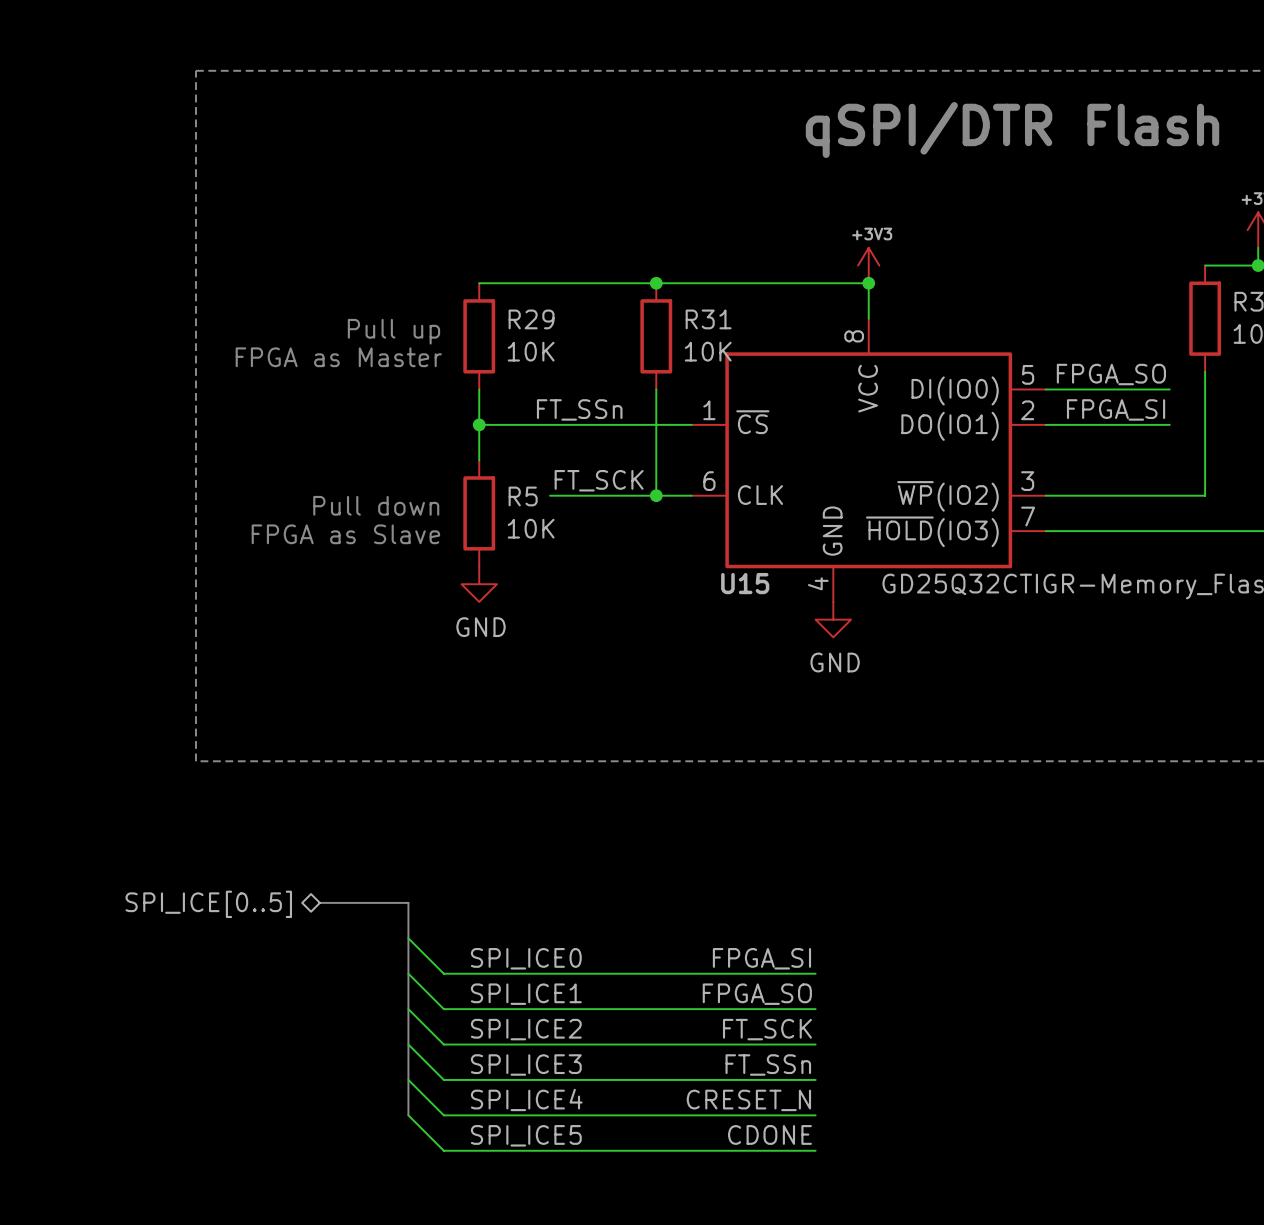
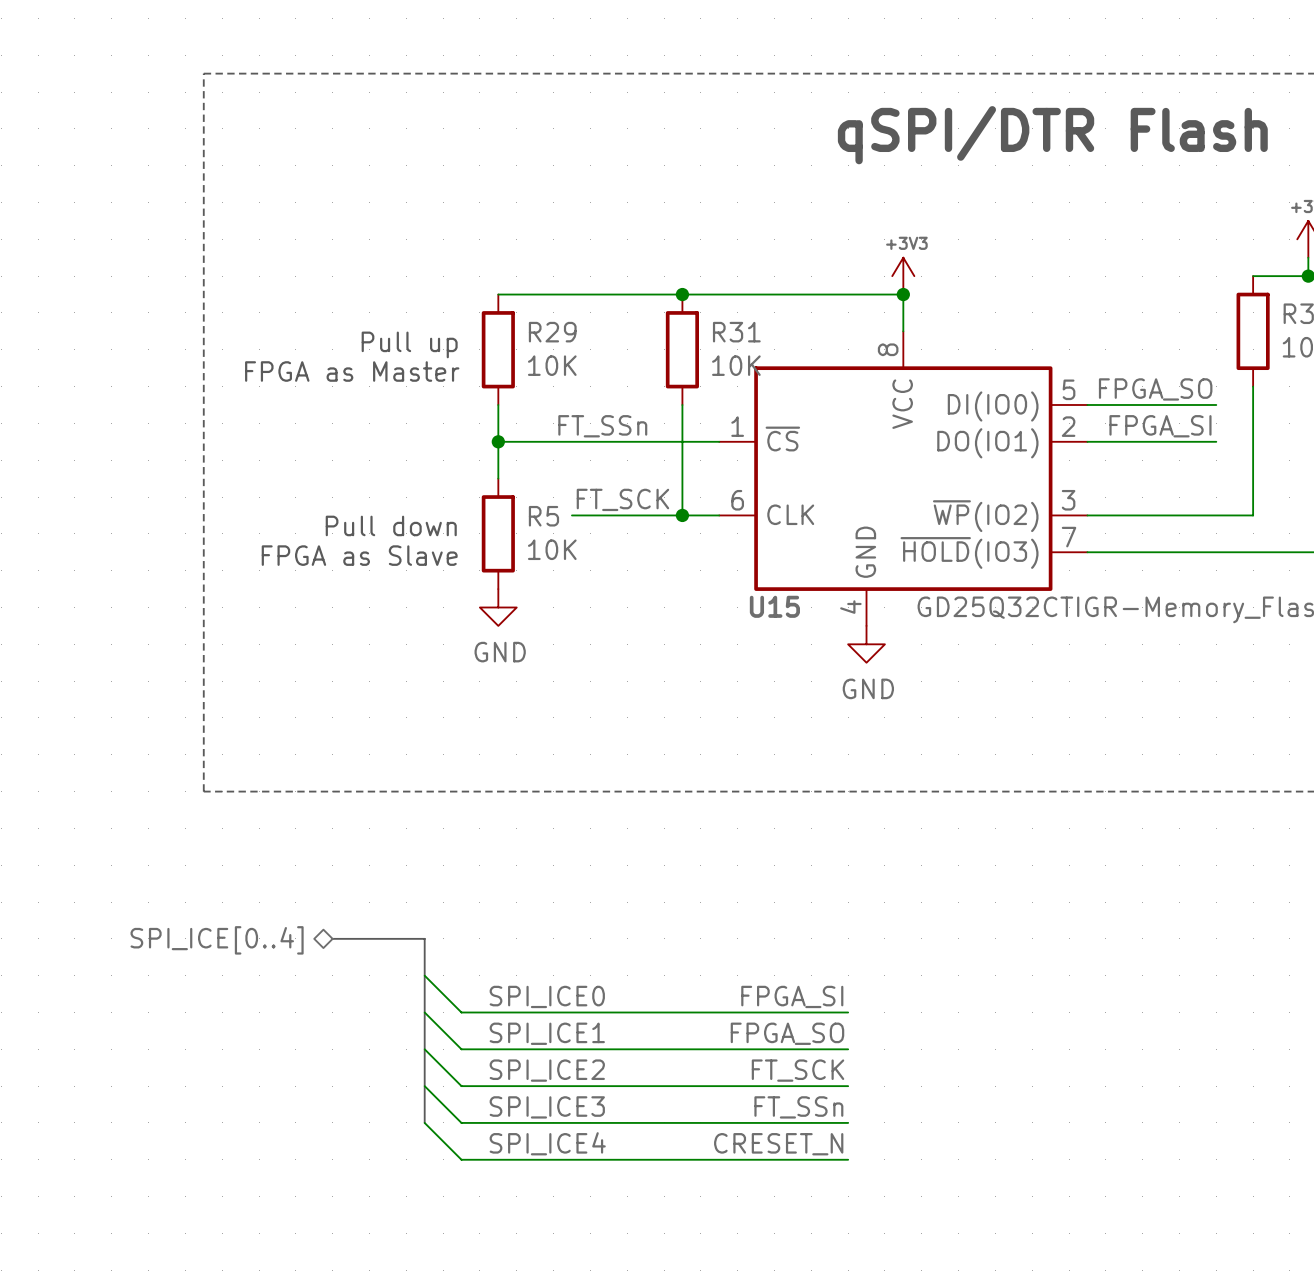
hierarchical label: SPI_ICE[0..5] (208, 904) -> SPI_ICE[0..4] (217, 940)
bus: (408, 1079) (408, 1115) -> none
wire: (408, 1115) (443, 1150) (815, 1150) -> none
label: CDONE (769, 1134) -> none
label: SPI_ICE5 (526, 1135) -> none

